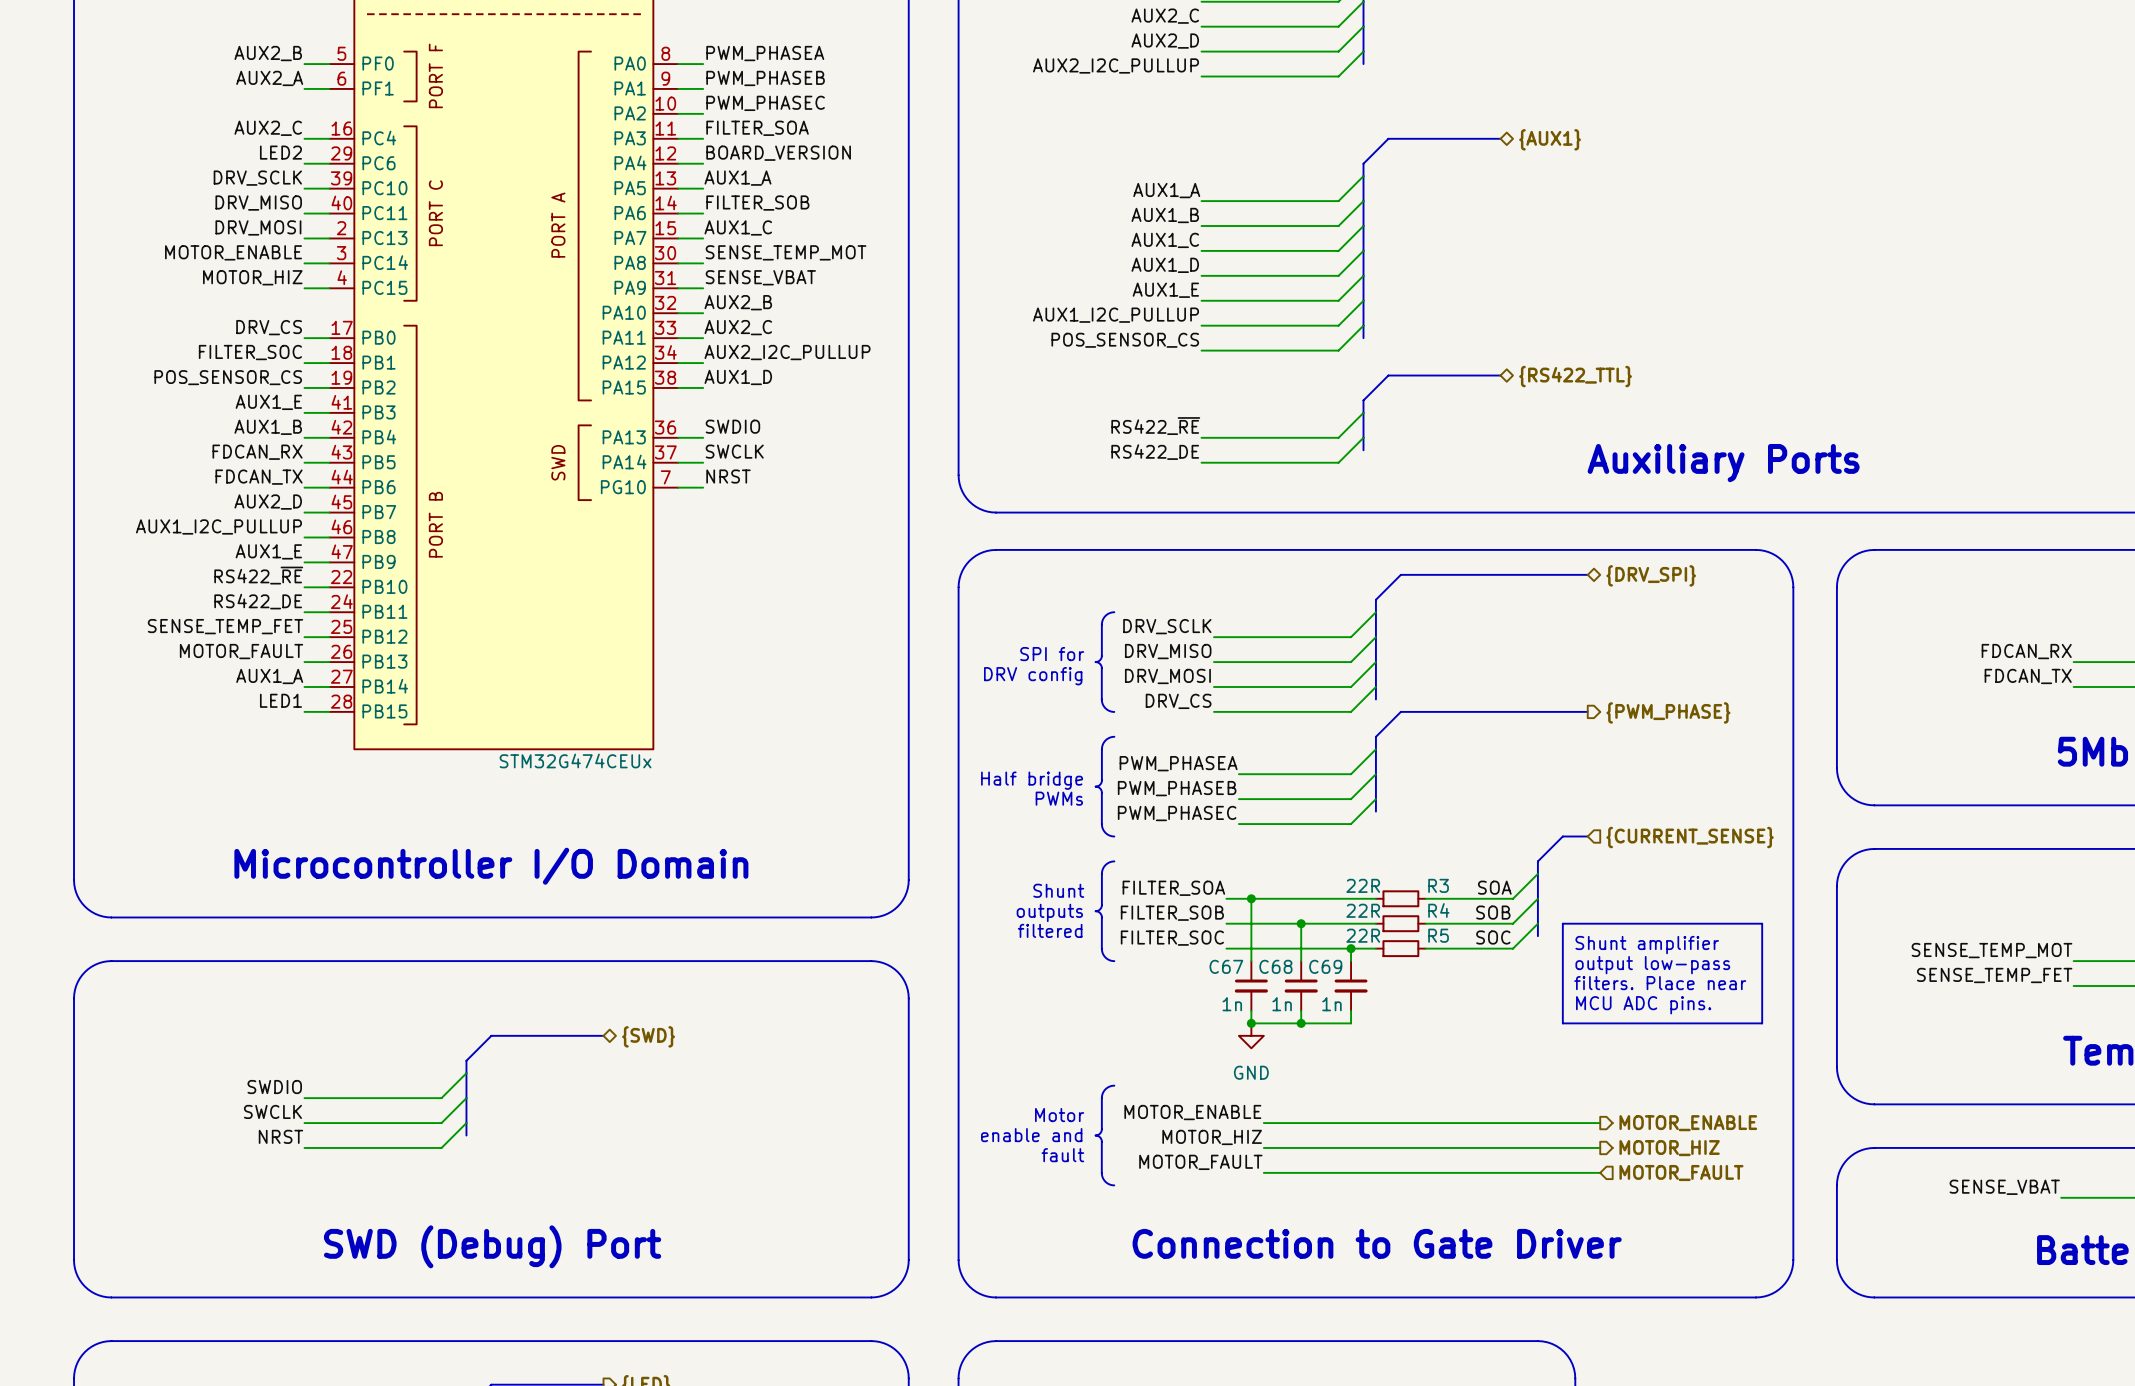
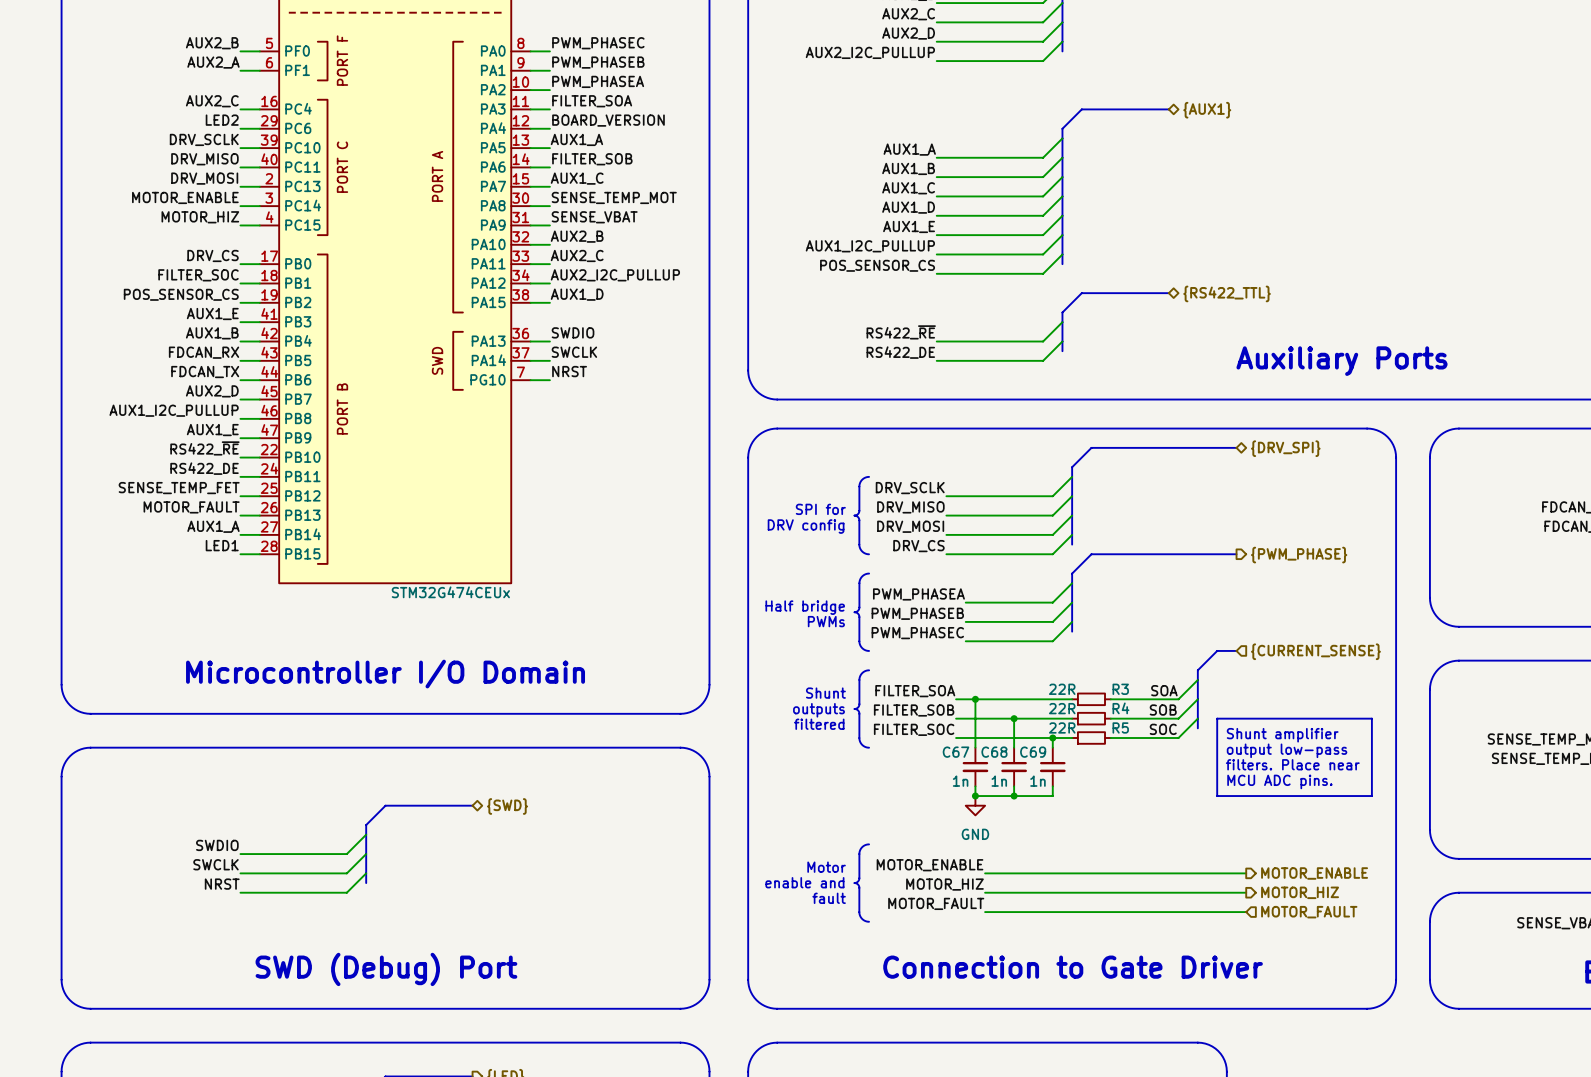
label: PWM_PHASEA (765, 53) -> PWM_PHASEC (598, 43)
label: PWM_PHASEC (765, 103) -> PWM_PHASEA (598, 81)

